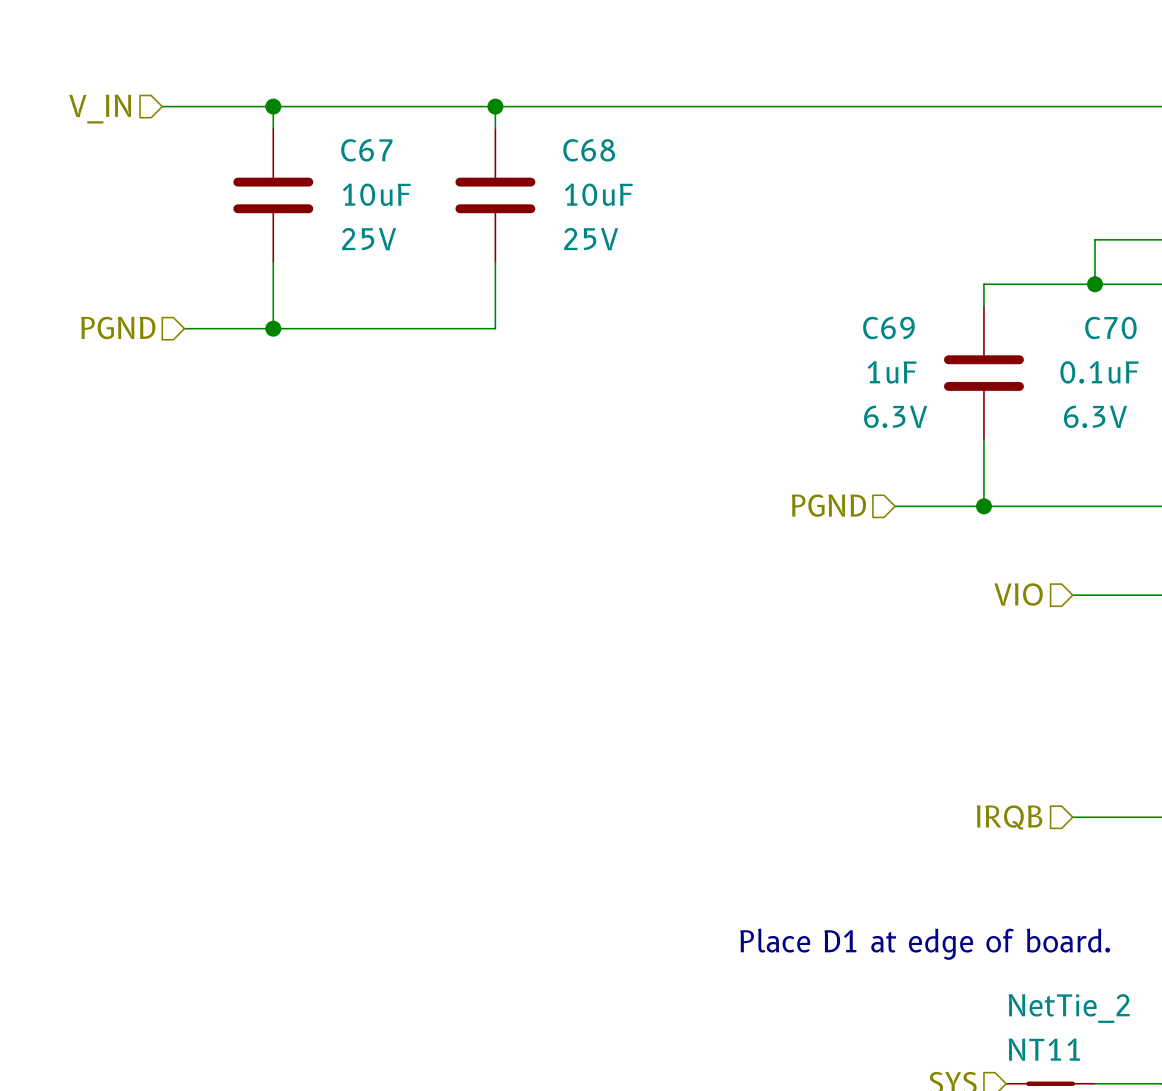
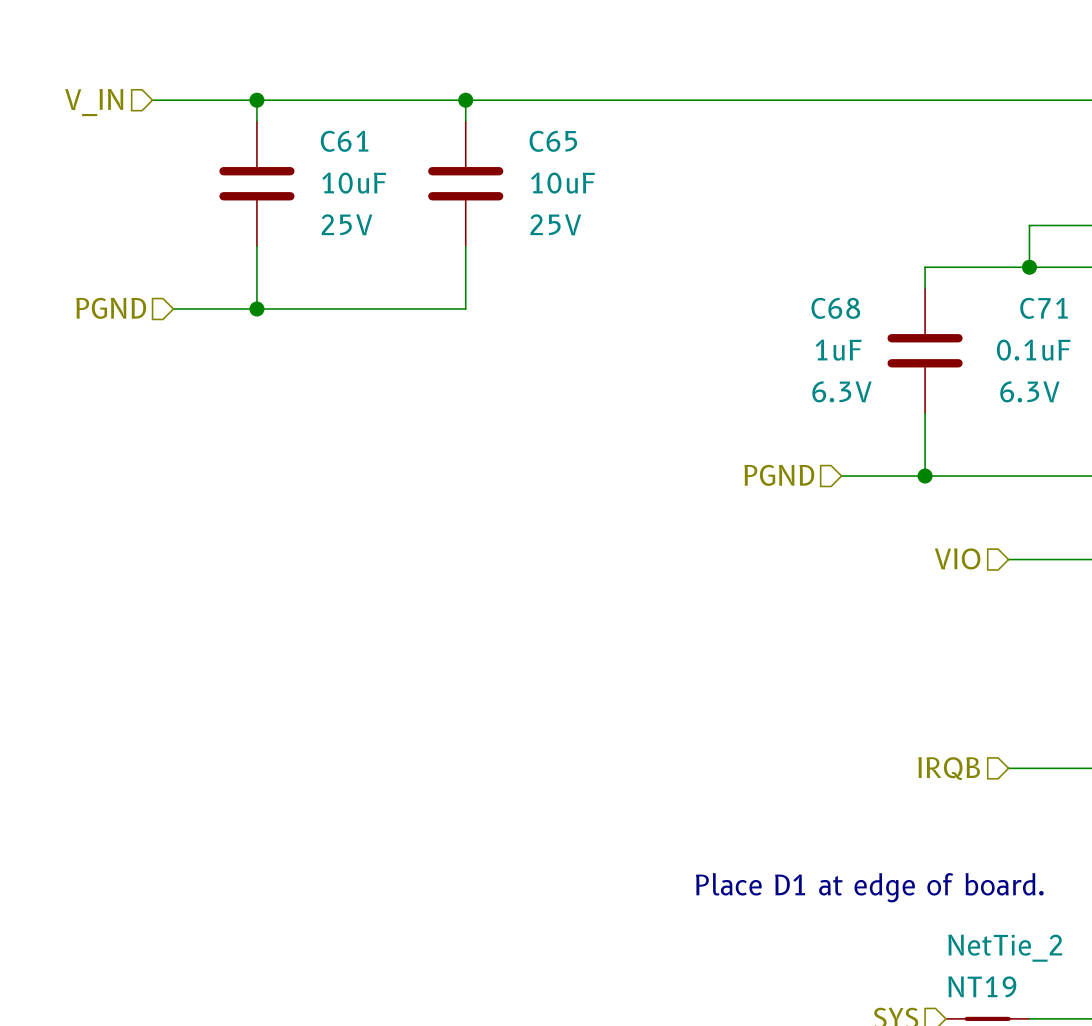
C67 name: C67 (366, 150) -> C61 (344, 141)
C68 name: C68 (589, 150) -> C65 (553, 141)
C69 name: C69 (888, 327) -> C68 (835, 308)
C70 name: C70 (1110, 327) -> C71 (1044, 308)
NT11 name: NT11 (1044, 1049) -> NT19 (982, 986)

